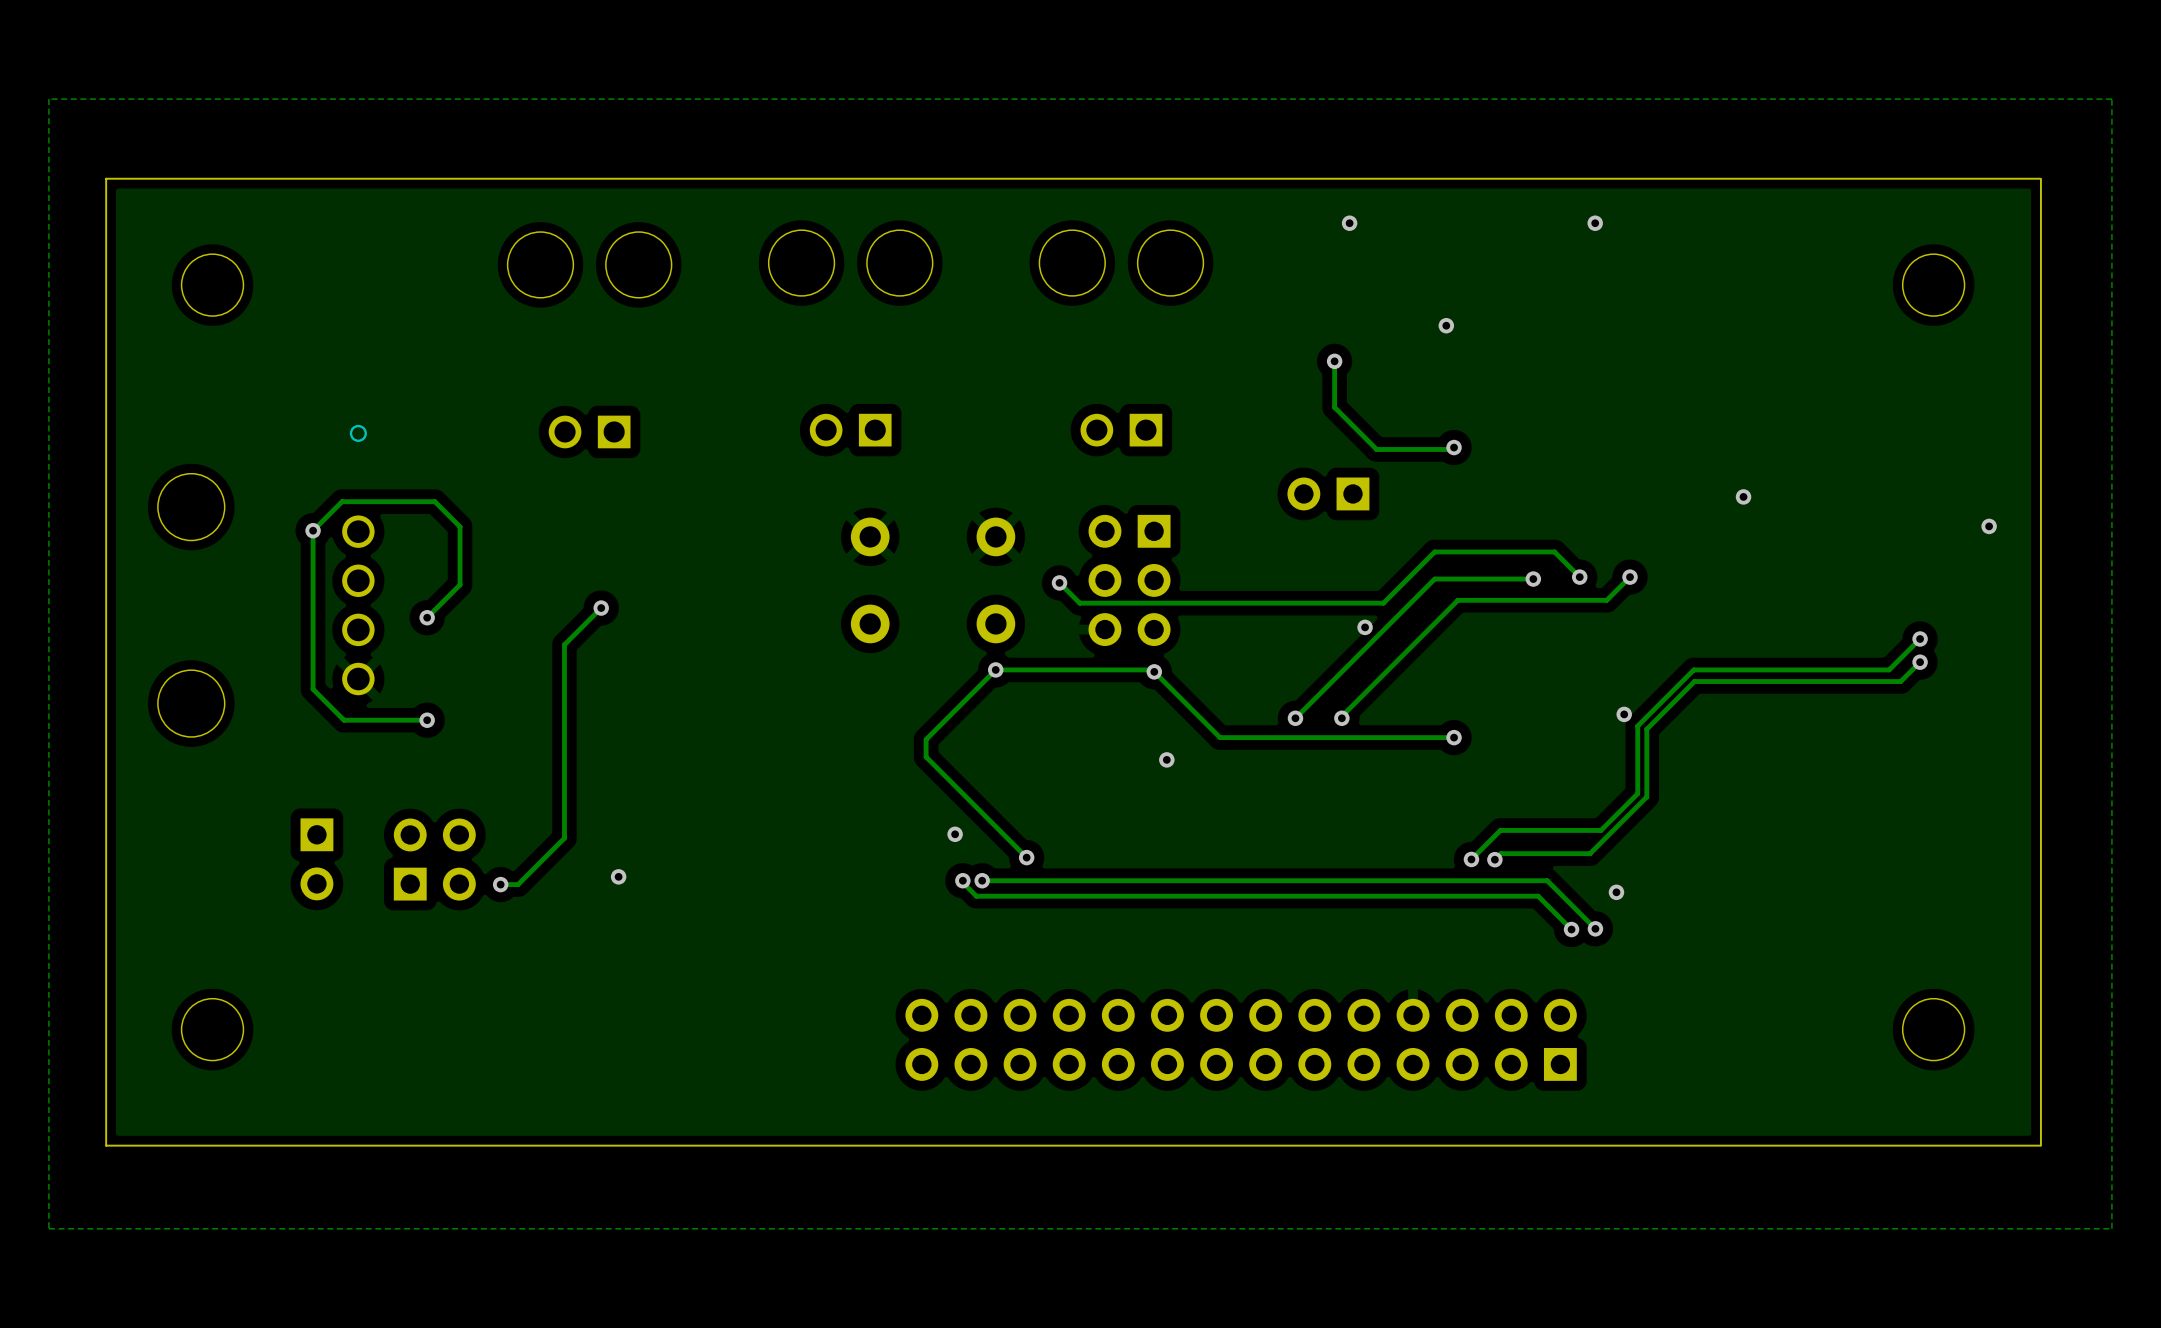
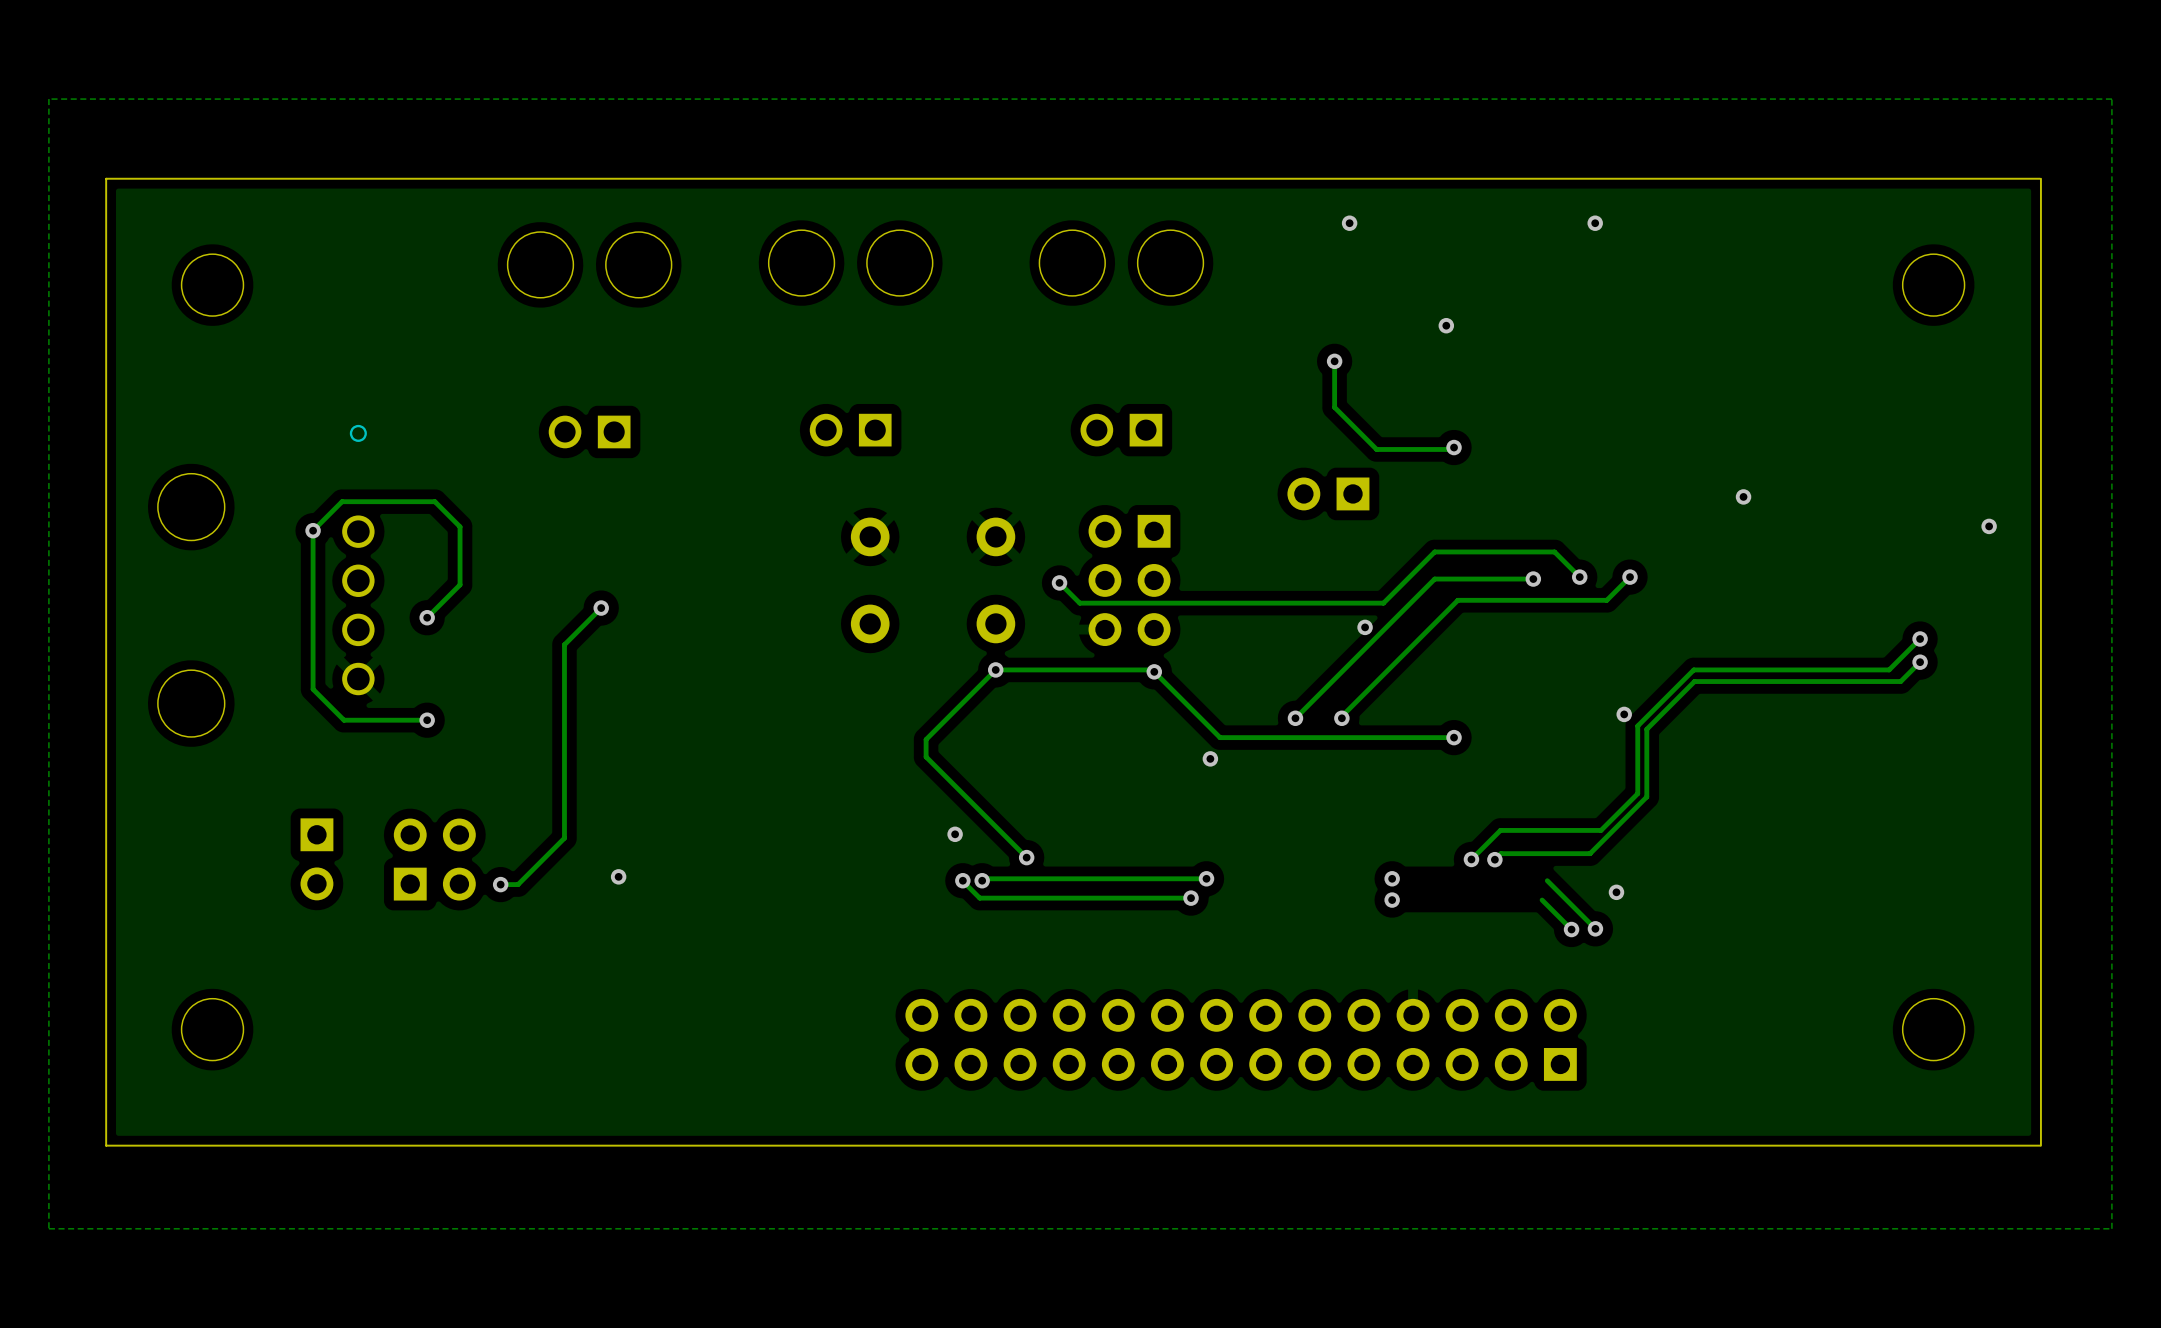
via position: (1166, 759) -> (1210, 758)
via: none -> (1206, 878)
via: none -> (1392, 878)
track: (1547, 880) (982, 880) -> (1206, 878) (984, 878) (982, 880)
track: (962, 881) (976, 896) (1538, 896) (1542, 900) -> (962, 881) (979, 898) (1191, 898)
via: none -> (1191, 898)
via: none -> (1392, 900)

